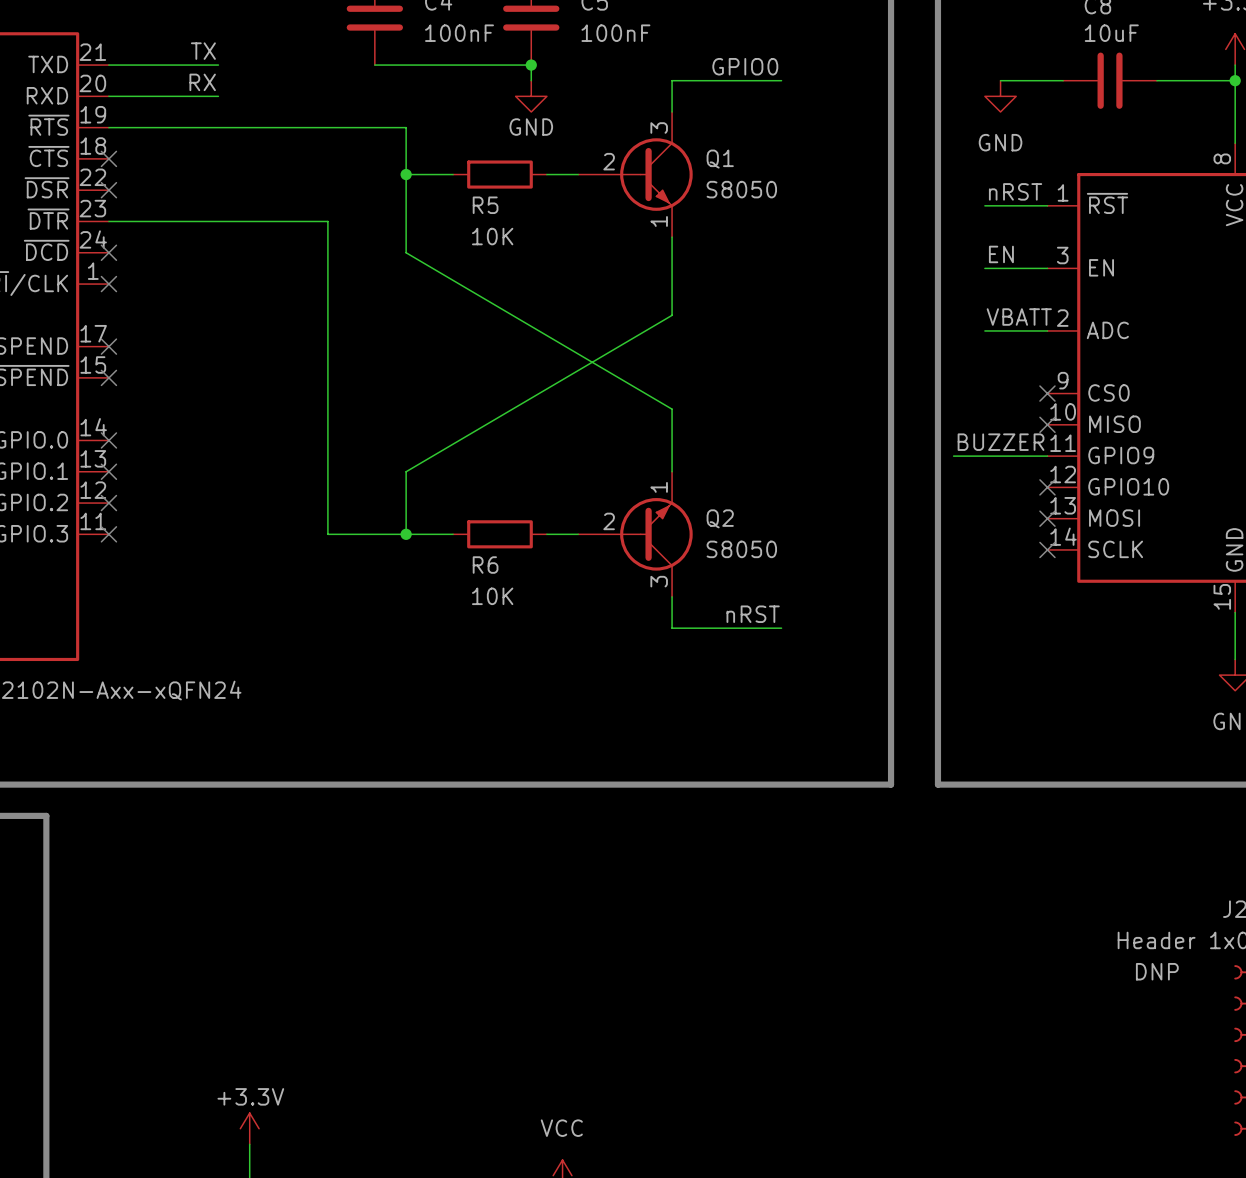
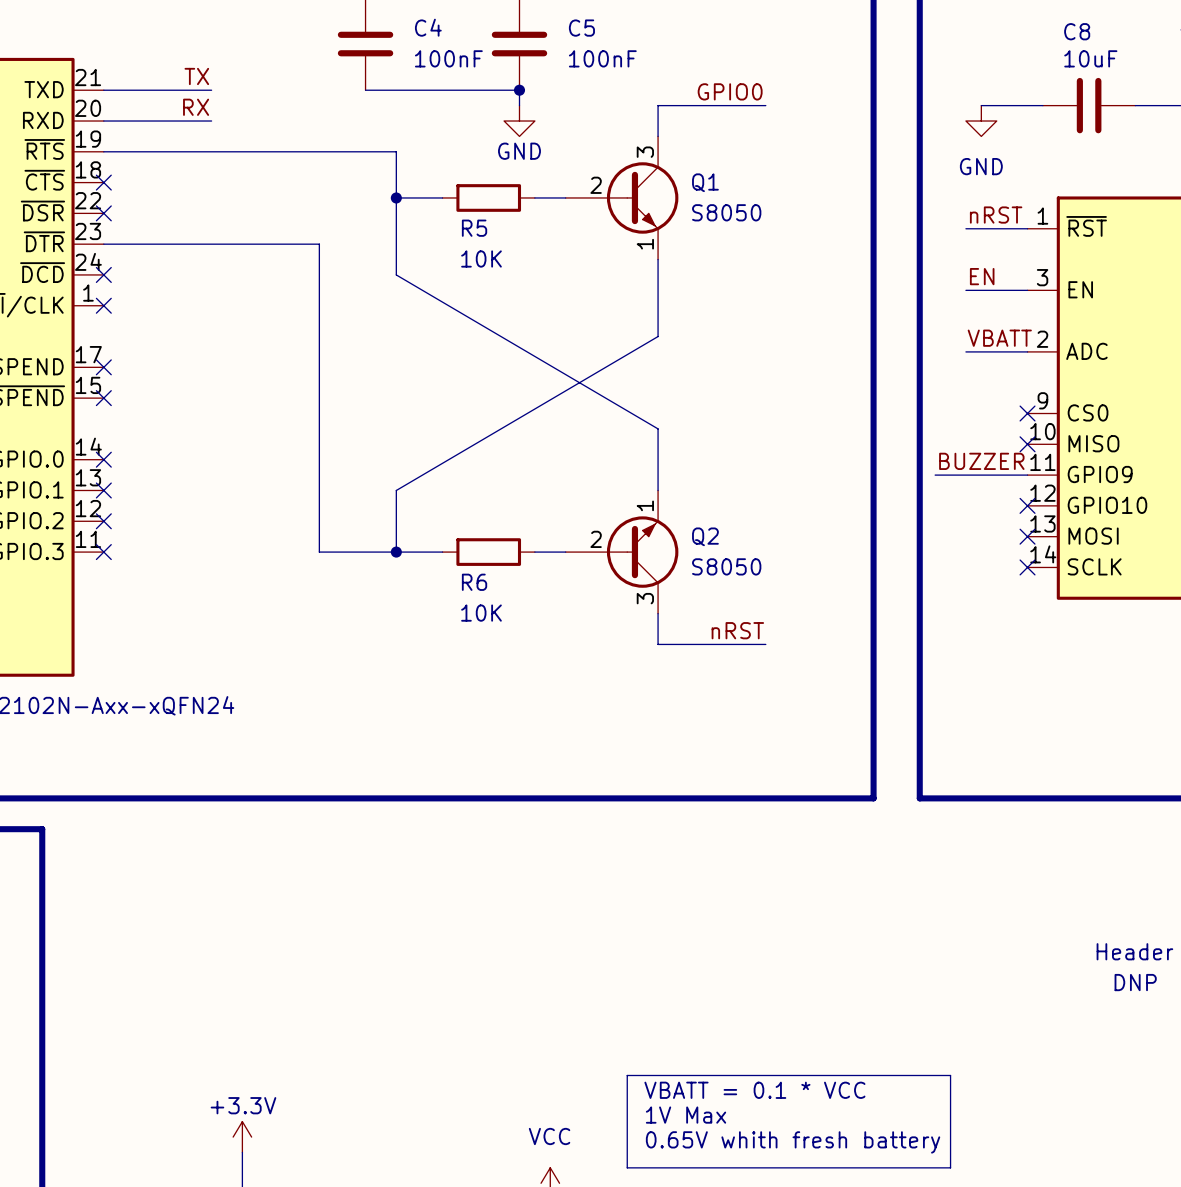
line: none -> (627, 1075) (627, 1167) (950, 1167) (950, 1075) (627, 1075)
text: none -> VBATT = 0.1 * VCC (754, 1090)
text: none -> 1V Max (686, 1115)
text: none -> 0.65V whith fresh battery (793, 1142)

